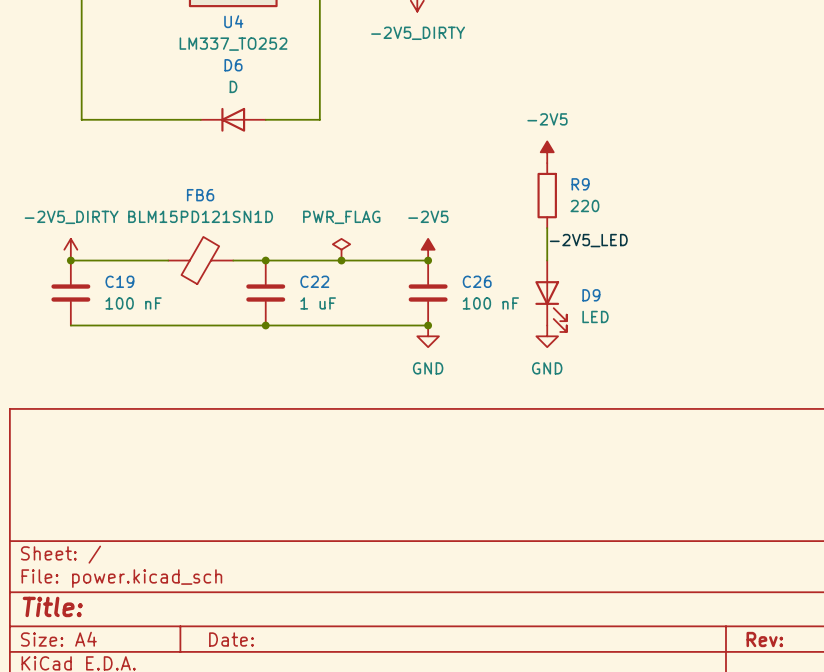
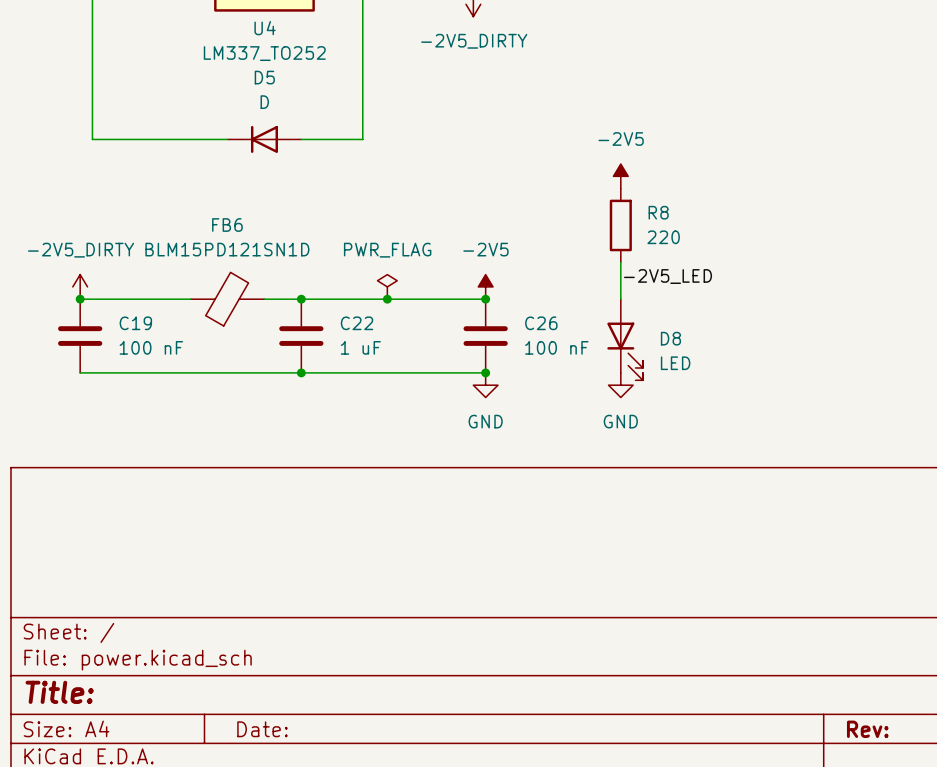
D6 name: D6 (233, 65) -> D5 (264, 77)
R9 name: R9 (580, 184) -> R8 (658, 212)
D9 name: D9 (591, 295) -> D8 (670, 338)

